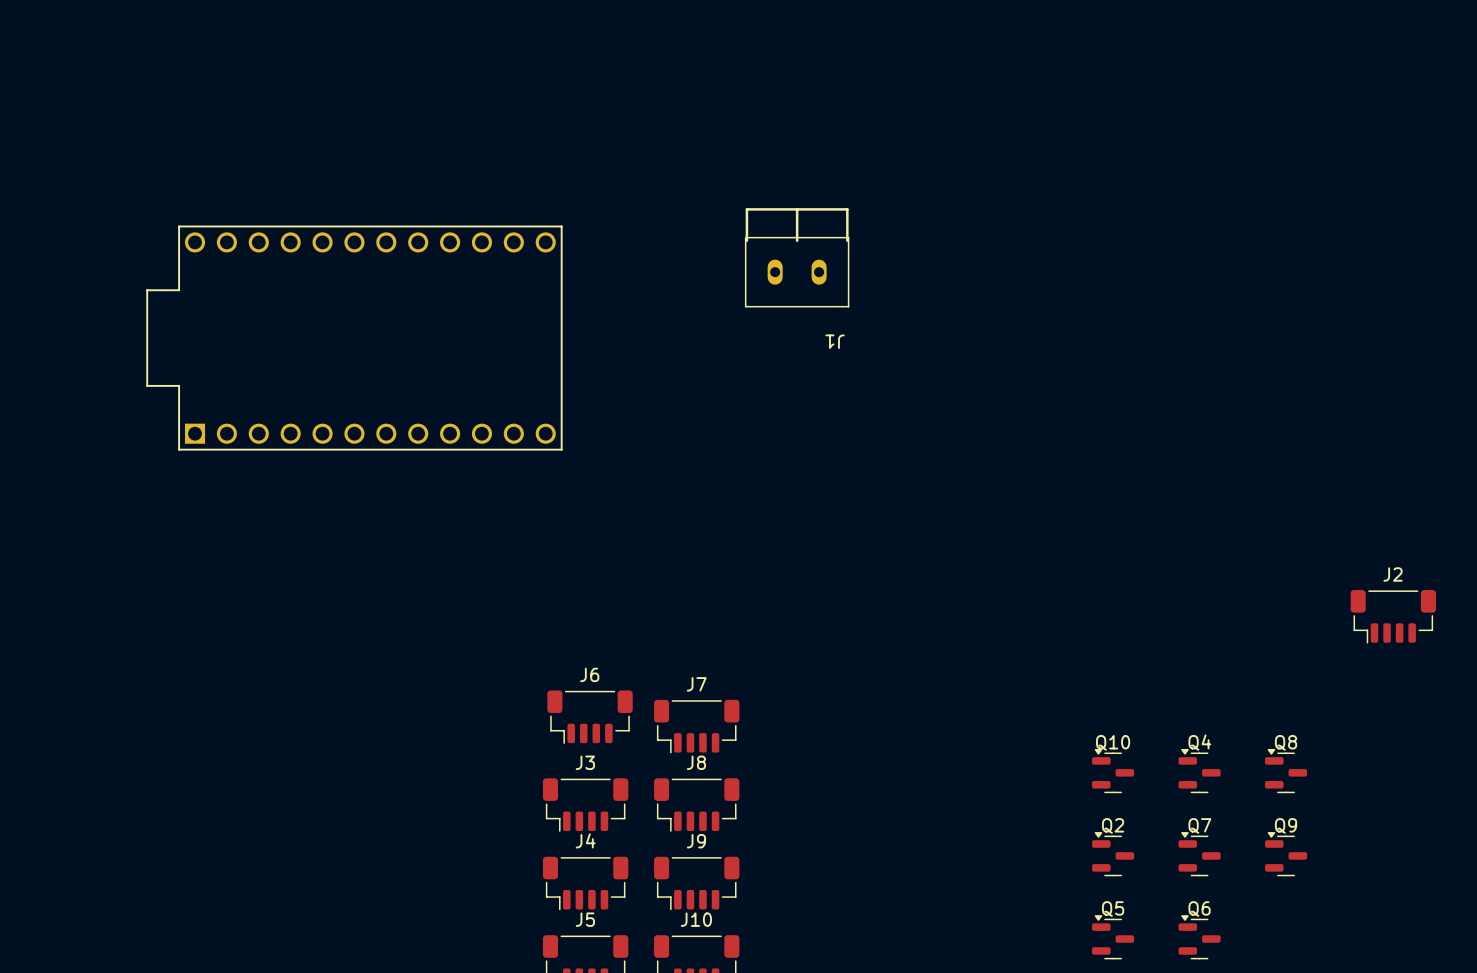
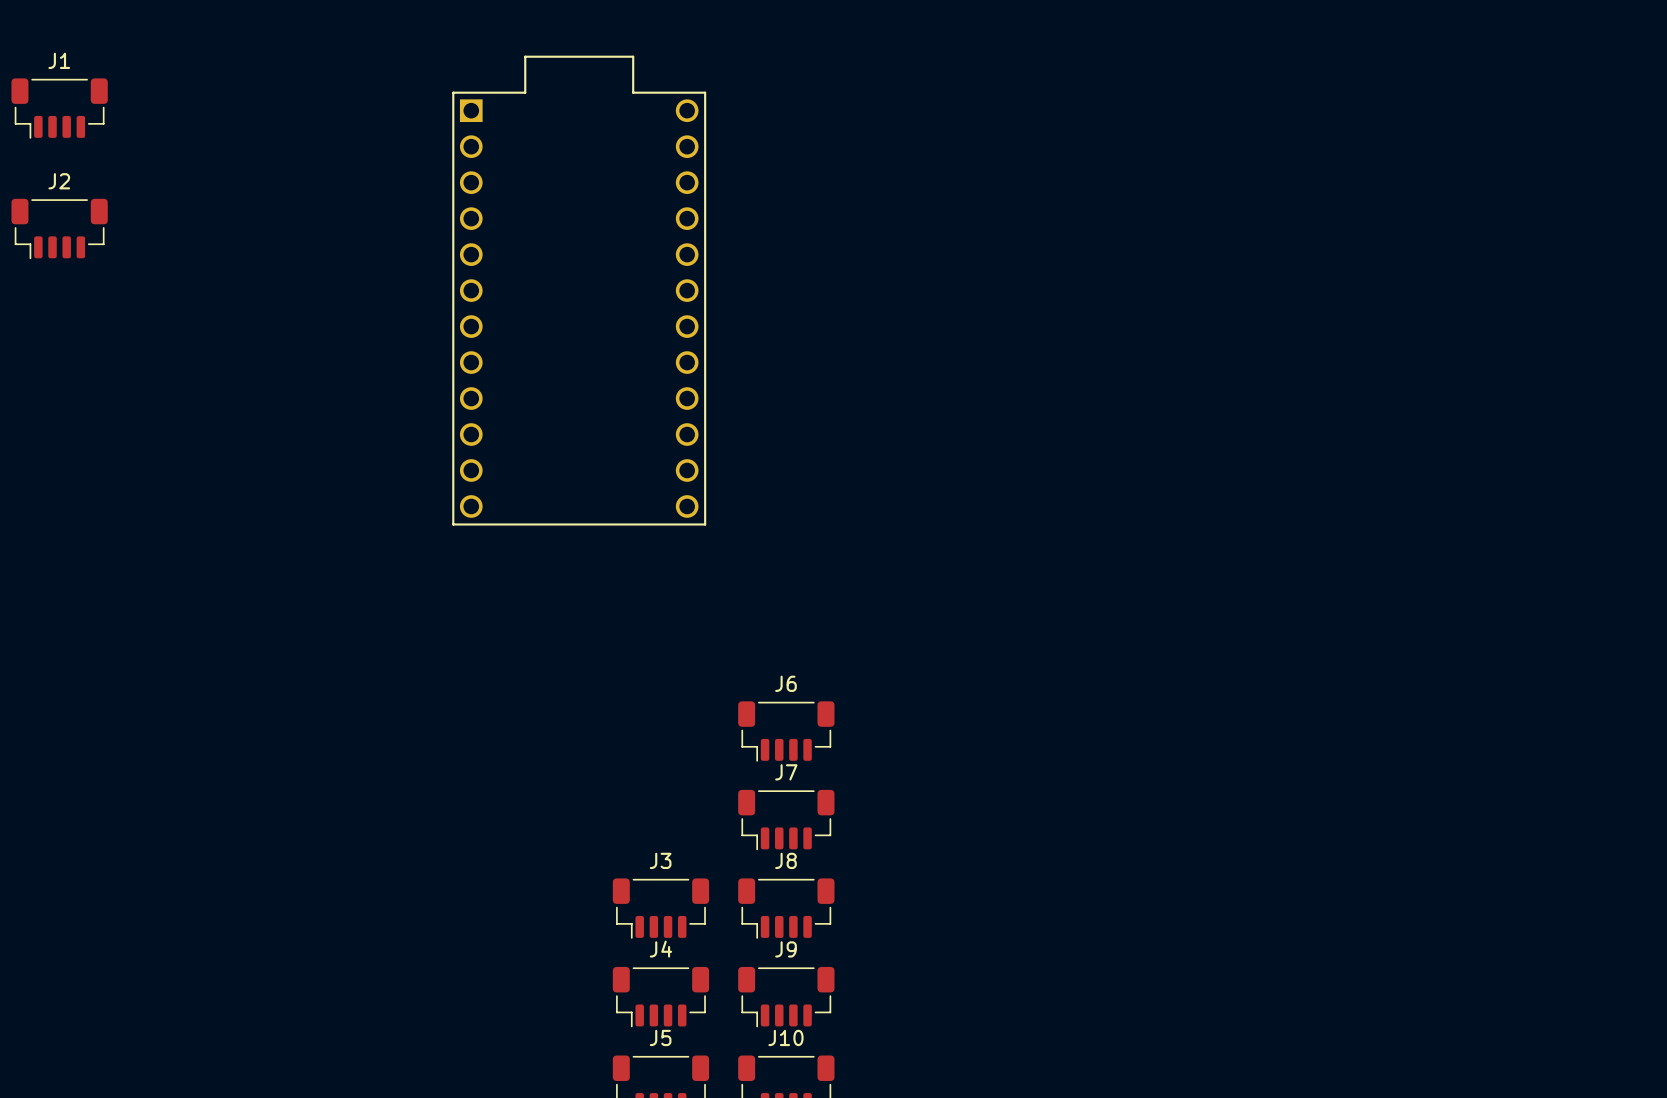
J1 footprint: [744, 208, 850, 308] -> [11, 78, 108, 139]
part rotation: 0° (354, 338) -> 90° clockwise (579, 290)
J1 name position: J1 (835, 341) -> J1 (59, 60)
J2 position: (1393, 616) -> (59, 228)
J6 position: (590, 717) -> (786, 731)
Q10: (1113, 771) -> none
Q4: (1199, 771) -> none
Q8: (1286, 771) -> none
Q2: (1113, 854) -> none
Q7: (1199, 854) -> none
Q9: (1286, 854) -> none
Q5: (1113, 937) -> none
Q6: (1199, 937) -> none

